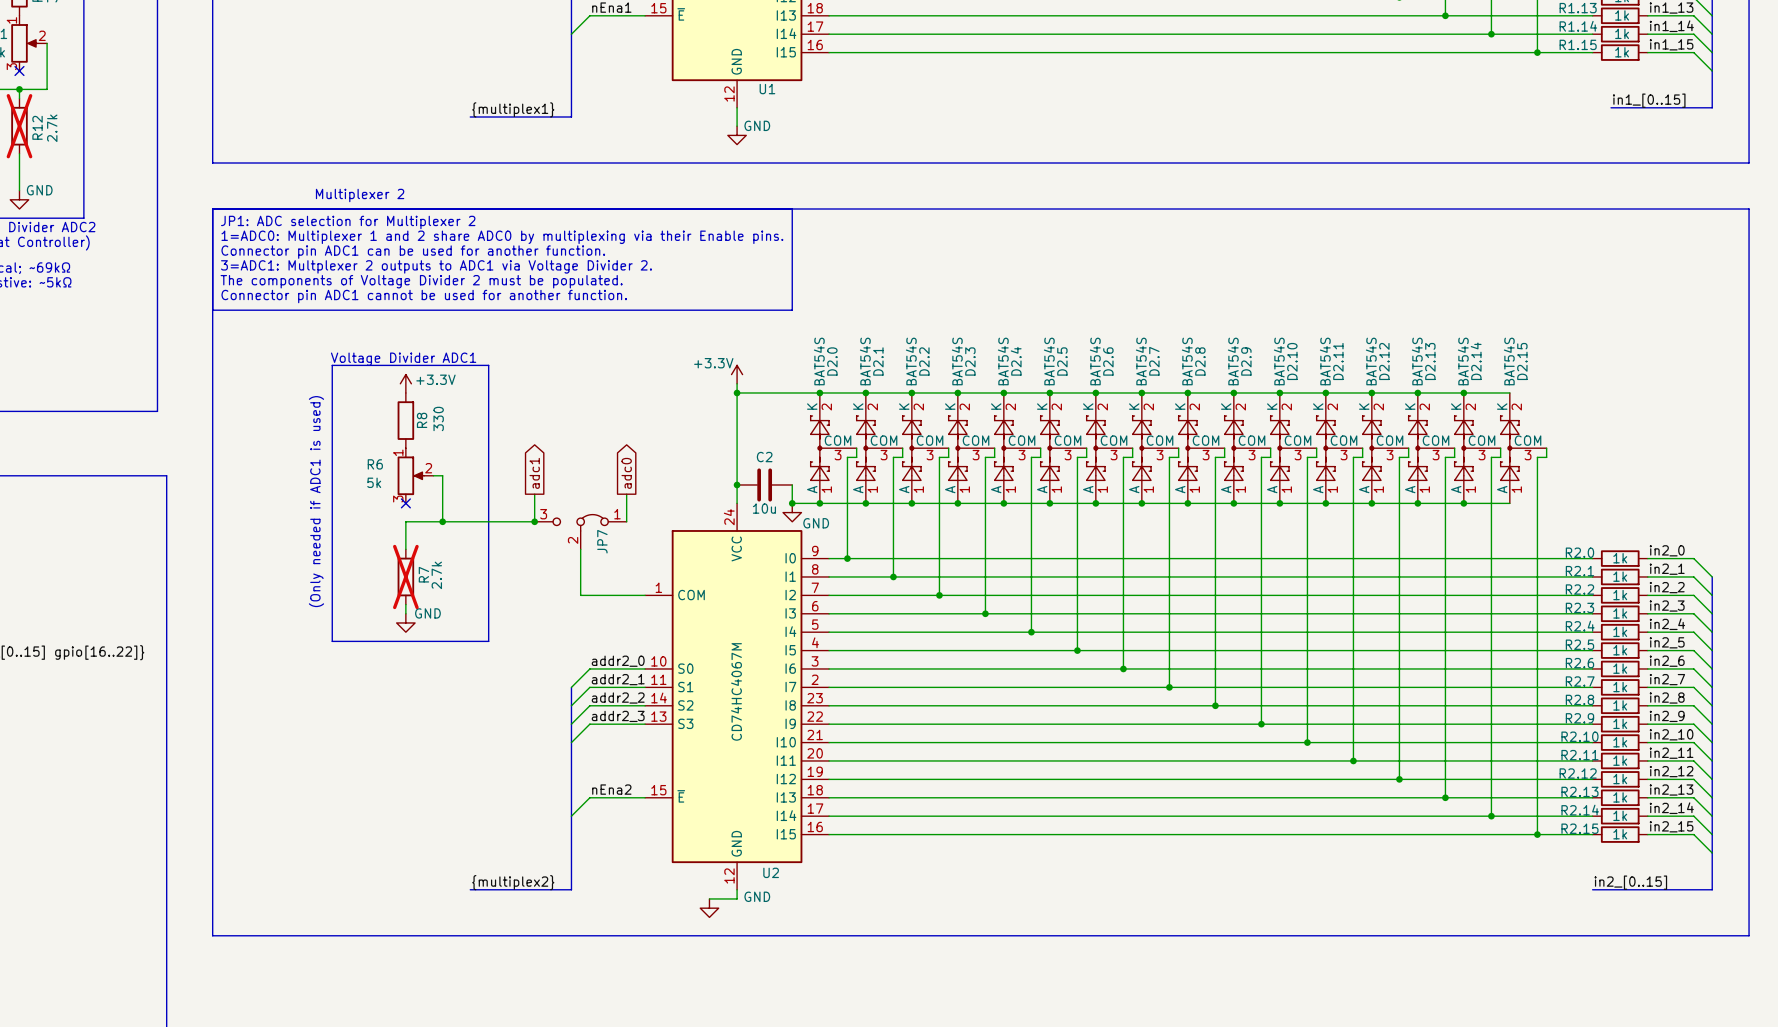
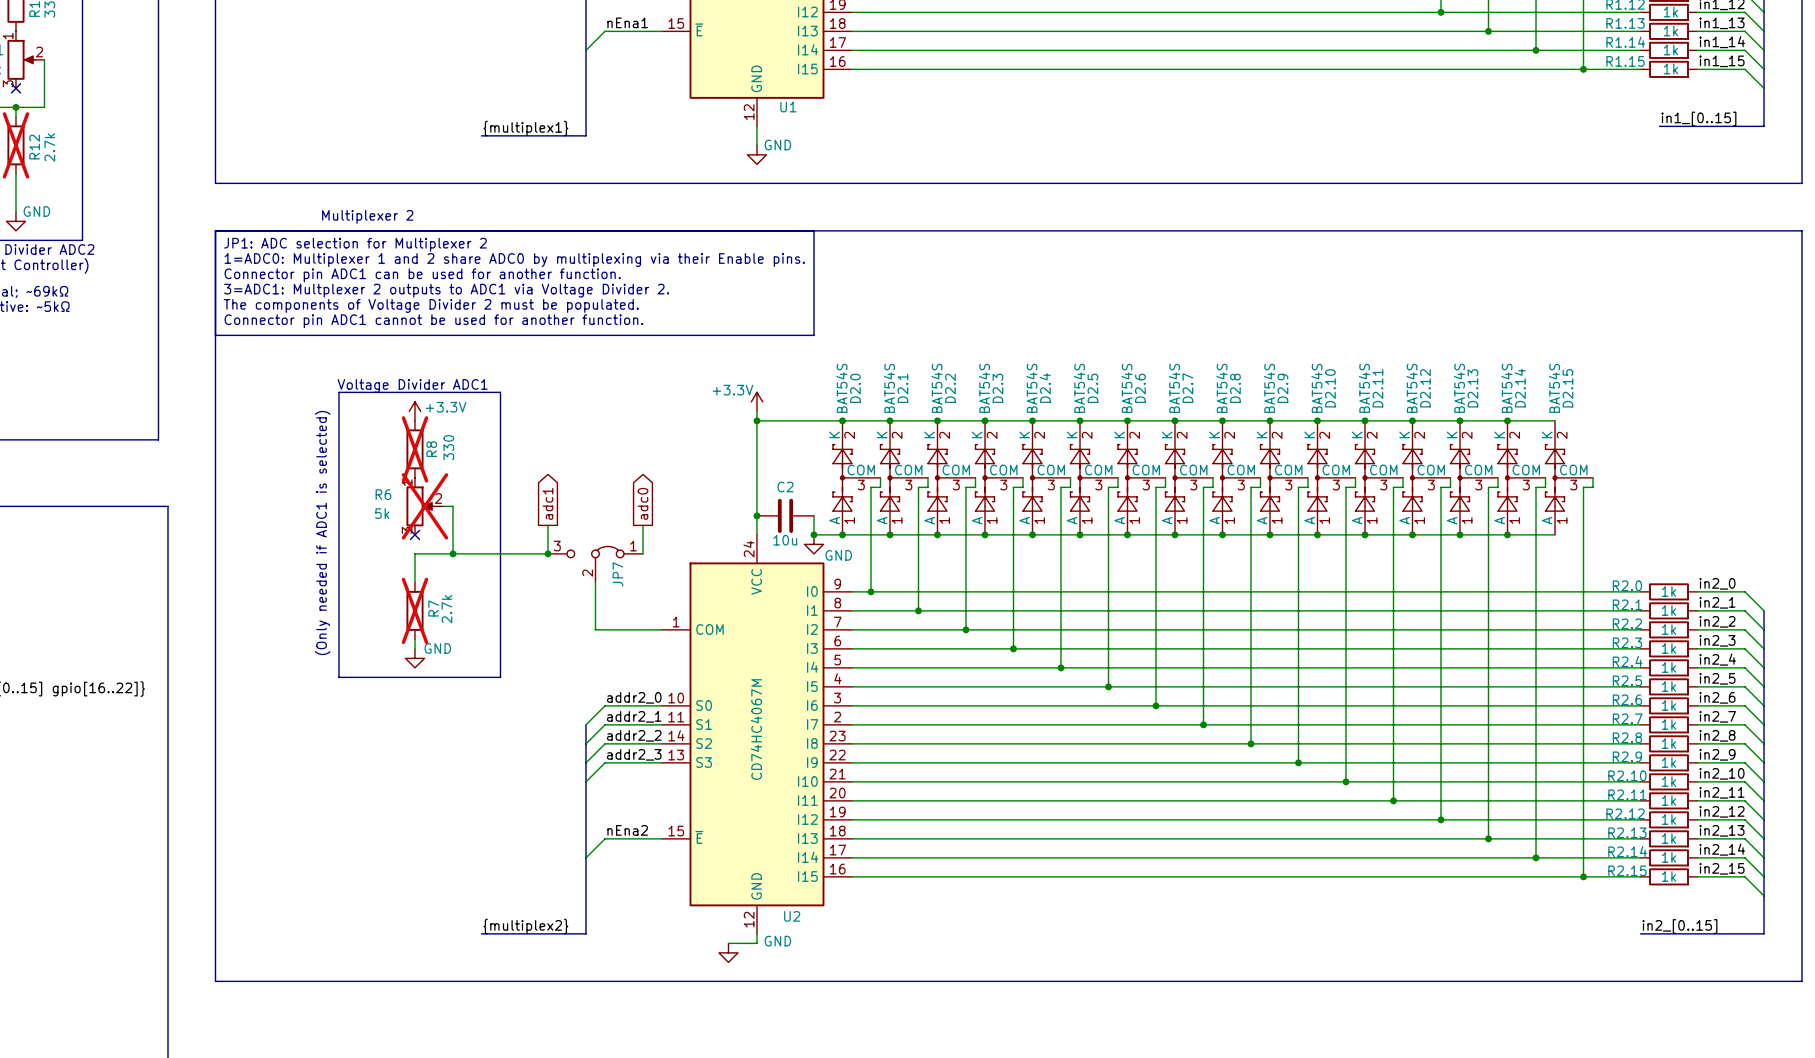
R8 do-not-place cross: none -> (414, 449)
R6 do-not-place cross: none -> (424, 506)
text: (Only needed if ADC1 is used) (316, 501) -> (Only needed if ADC1 is selected) (322, 533)

